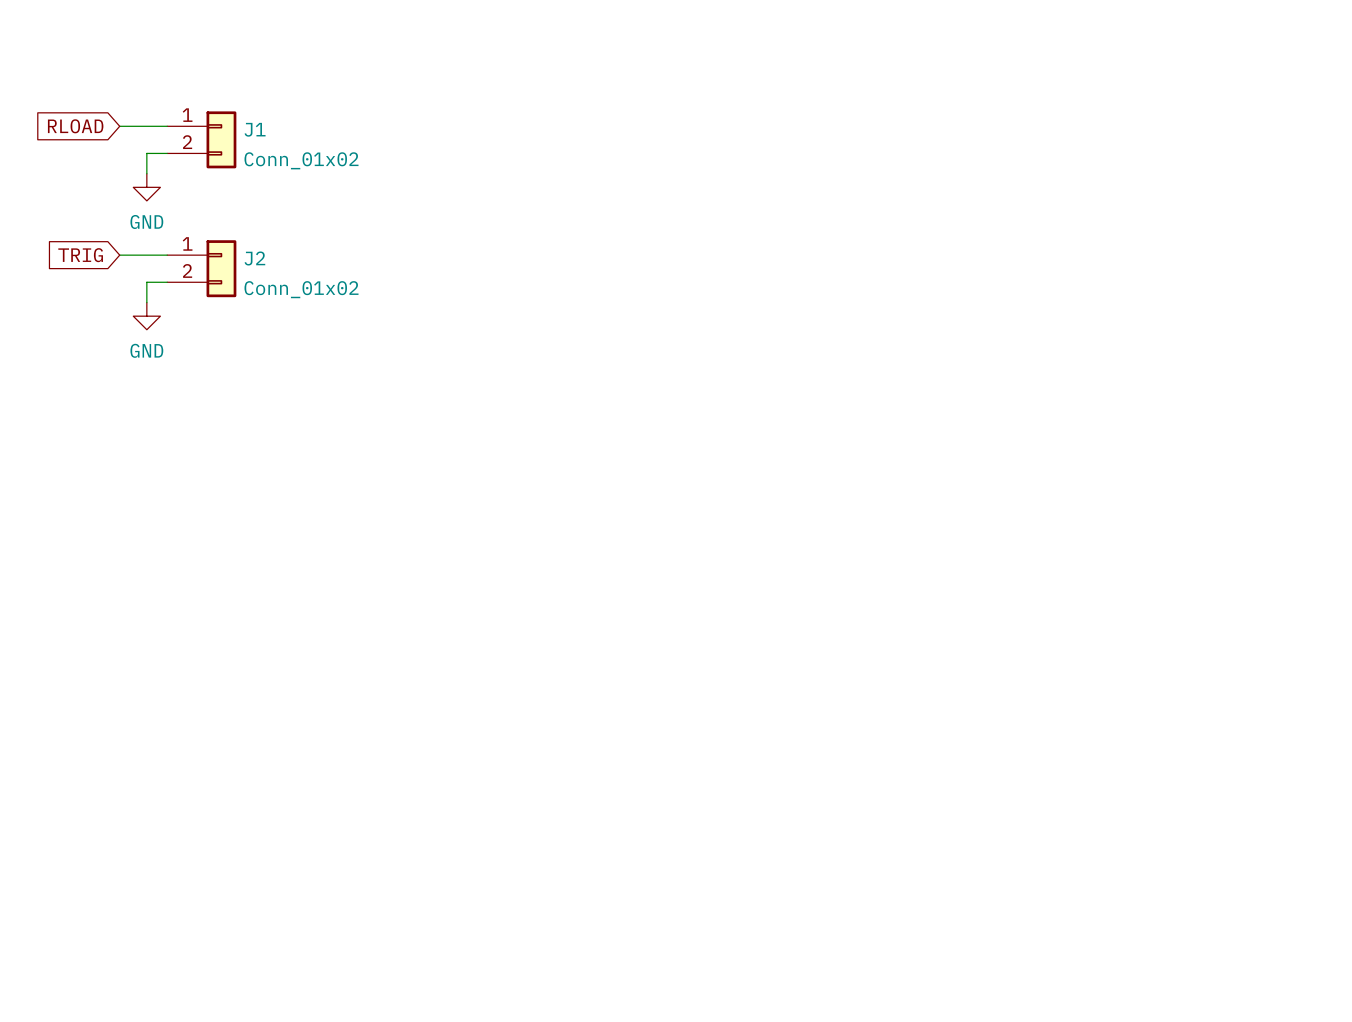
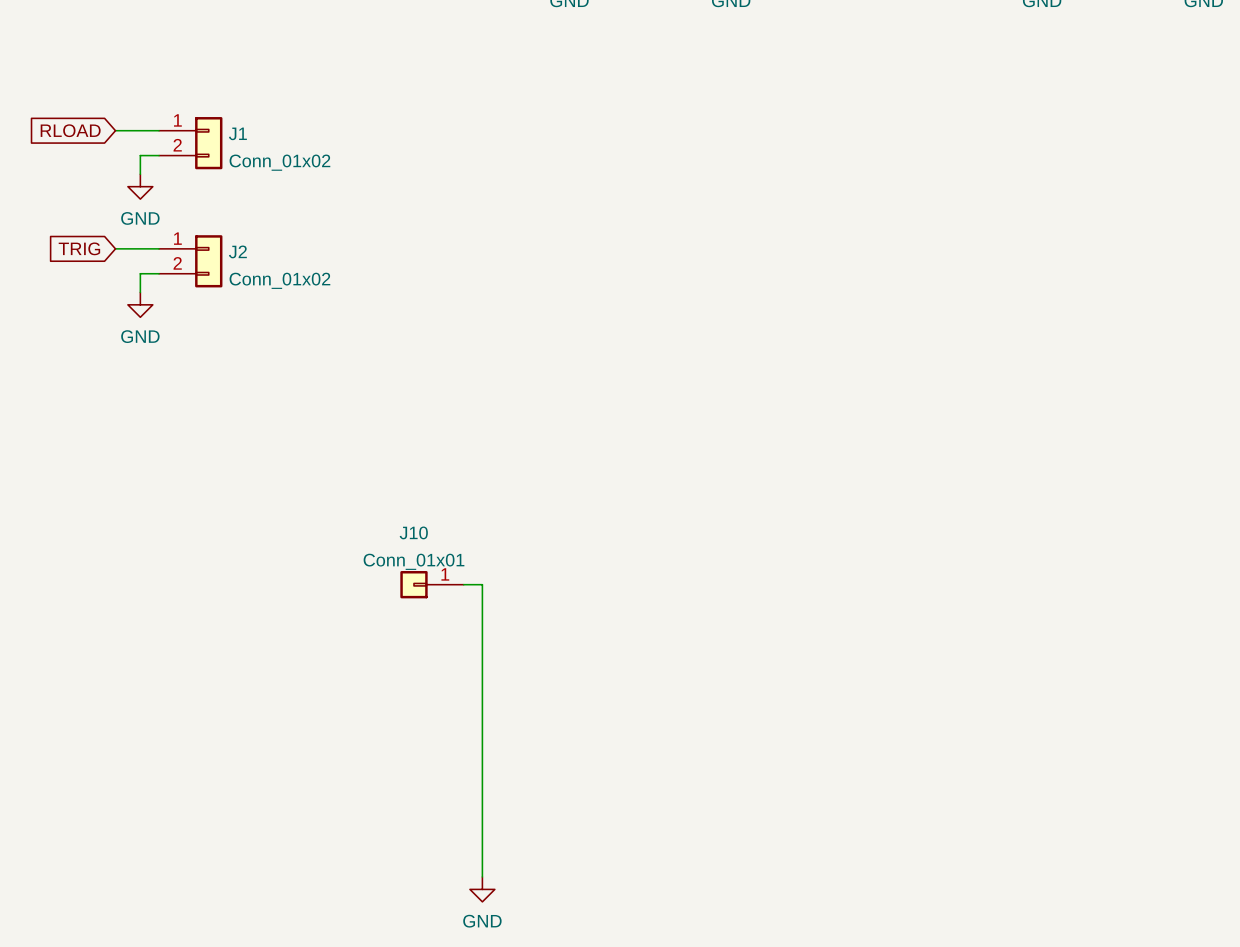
J10: none -> Conn_01x01 (432, 584)
wire: none -> (463, 584) (482, 584) (482, 876)
power symbol: none -> GND (482, 889)

